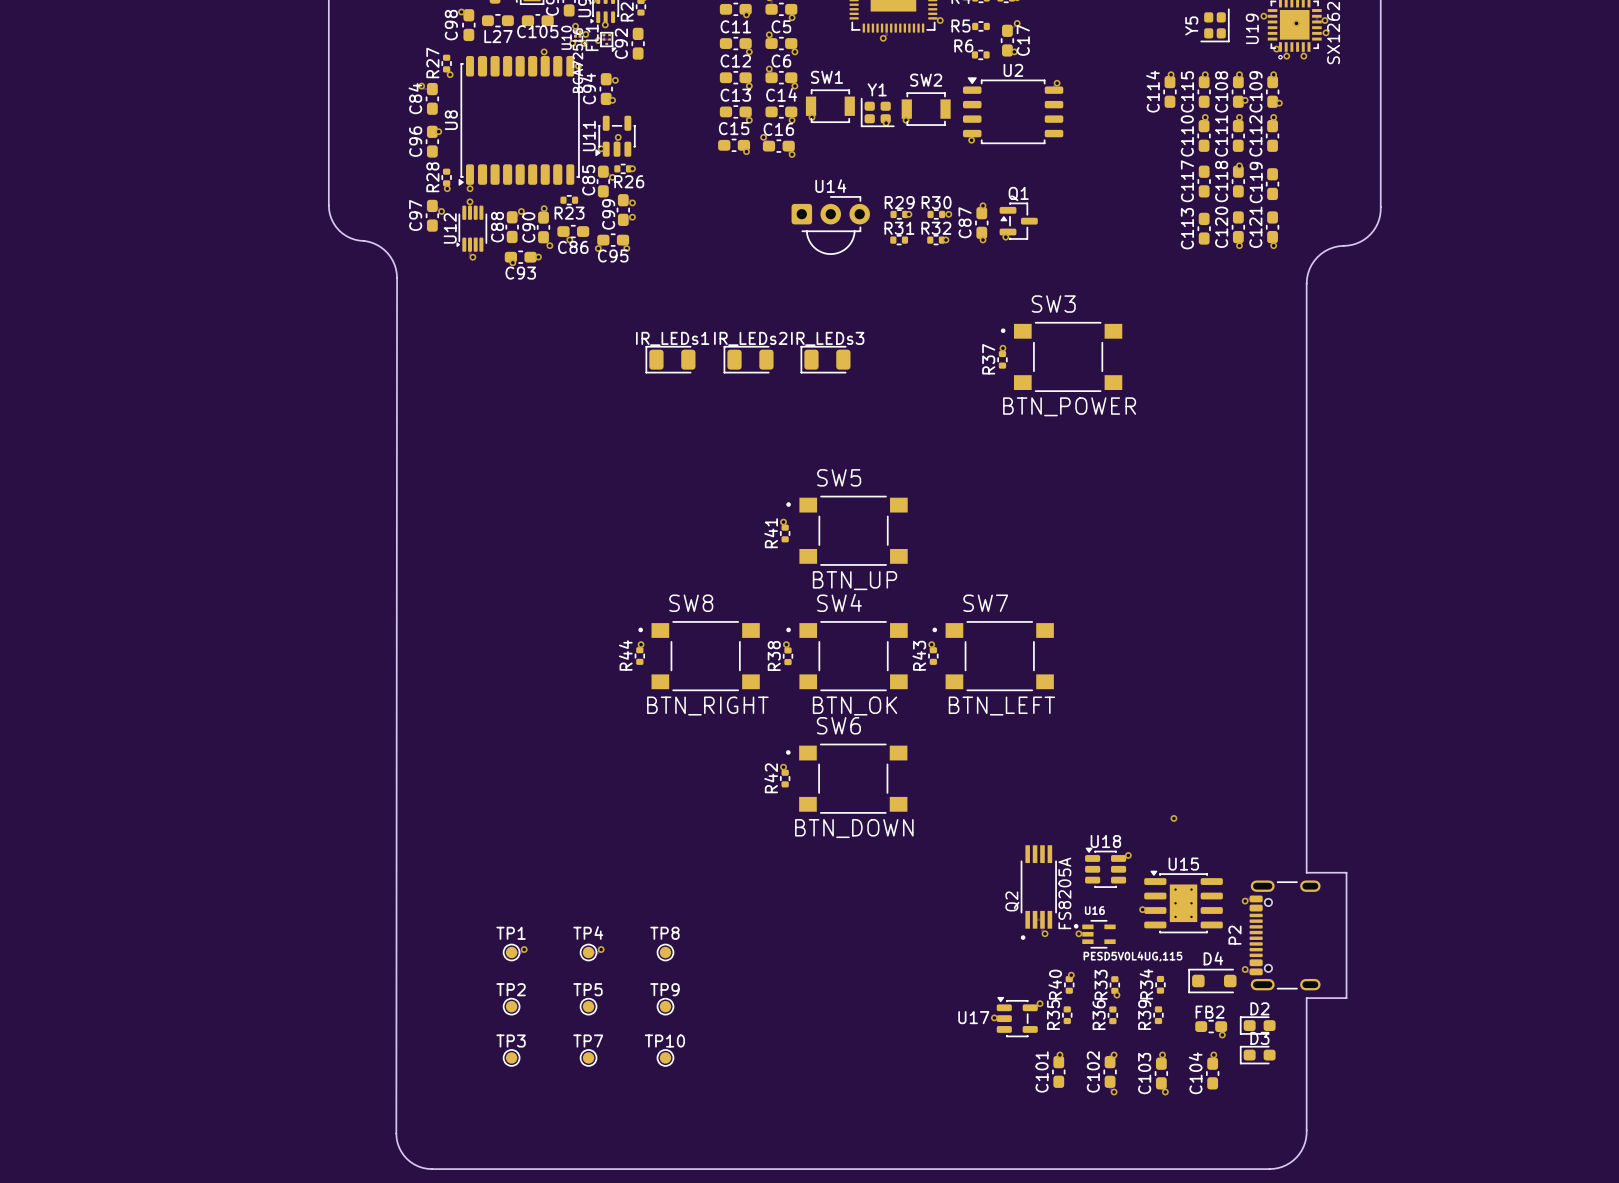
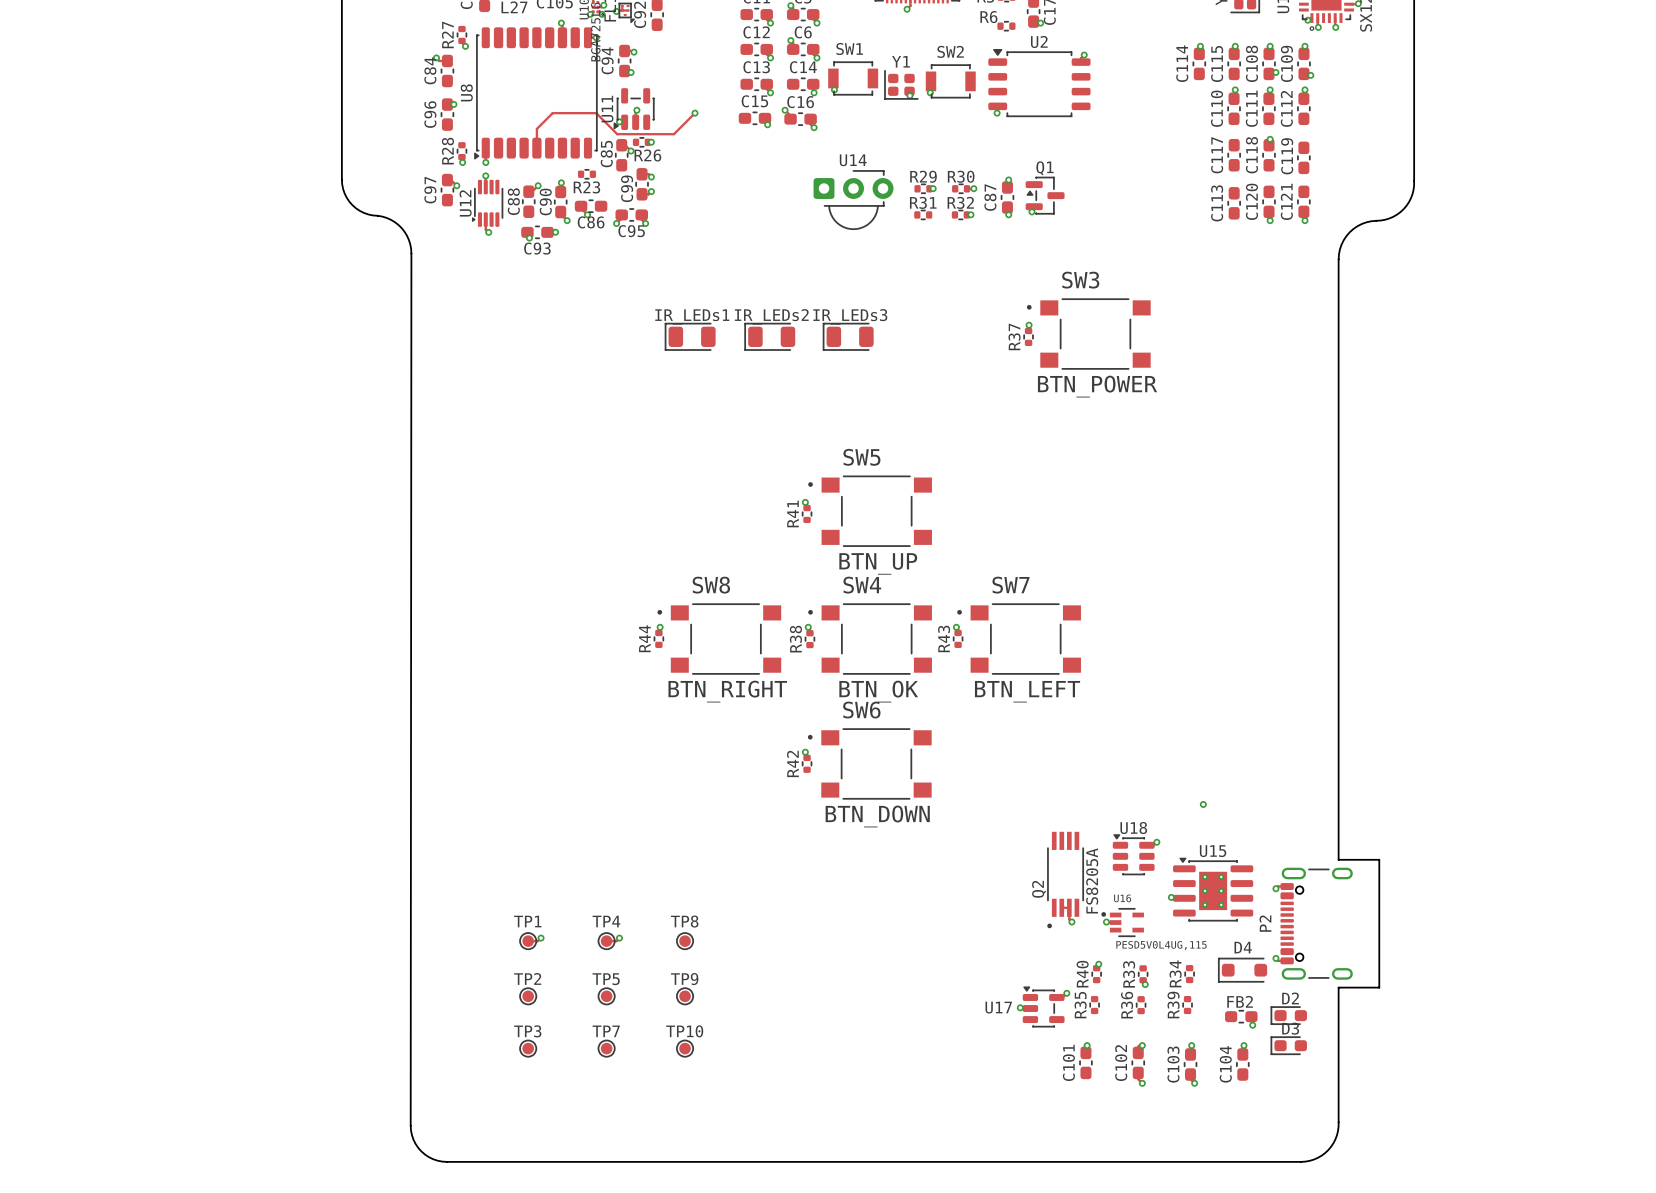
track: none -> (695, 113) (673, 134) (617, 134) (596, 113) (552, 113) (536, 128) (536, 148)
via: none -> (695, 113)

